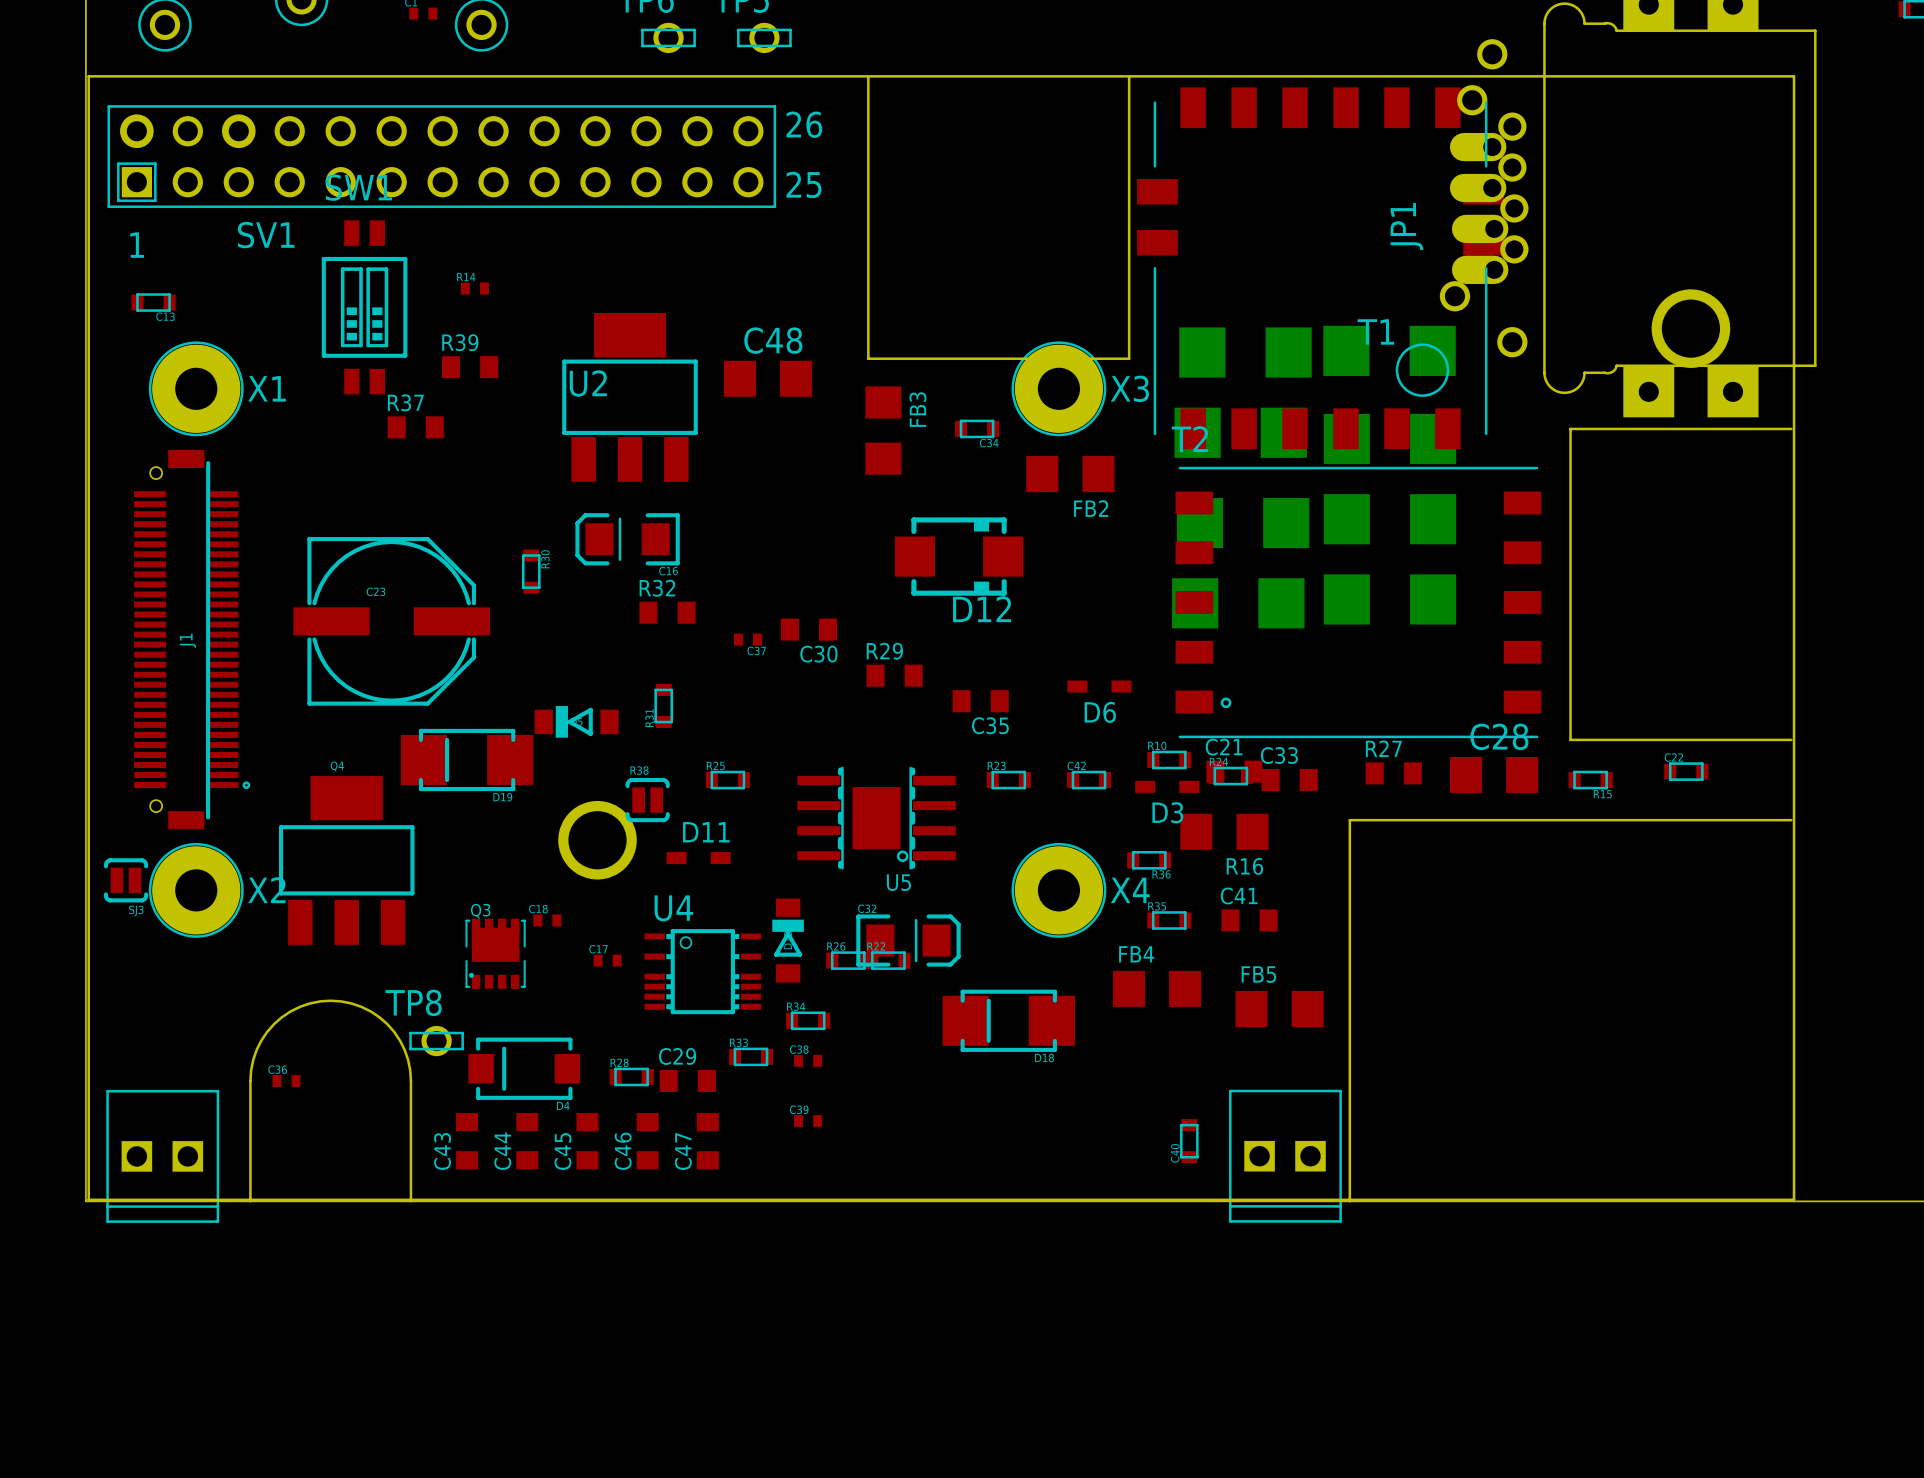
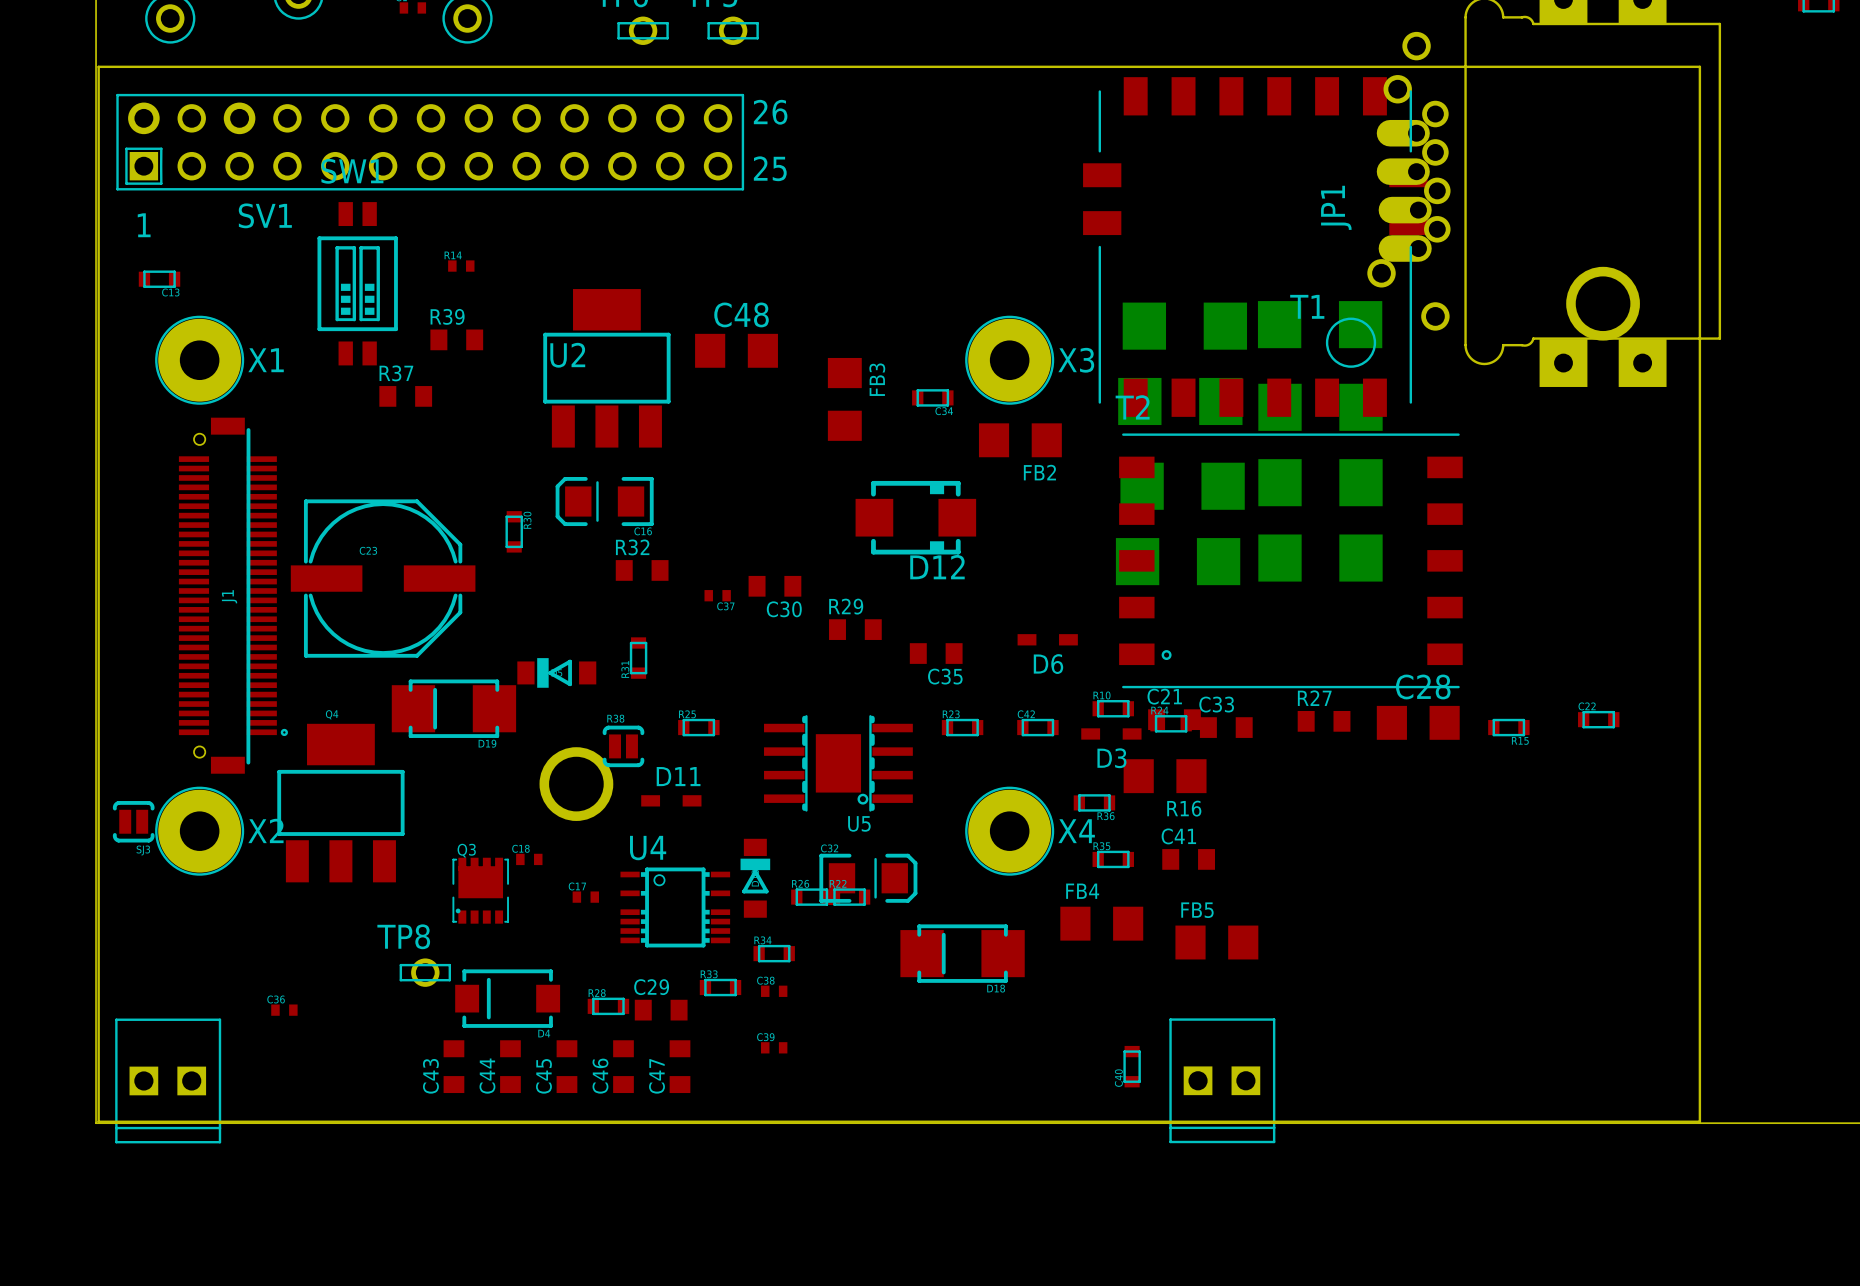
SV1 footprint: [87, 75, 1796, 1203] -> [97, 65, 1702, 1123]
J1 position: (192, 639) -> (233, 595)

